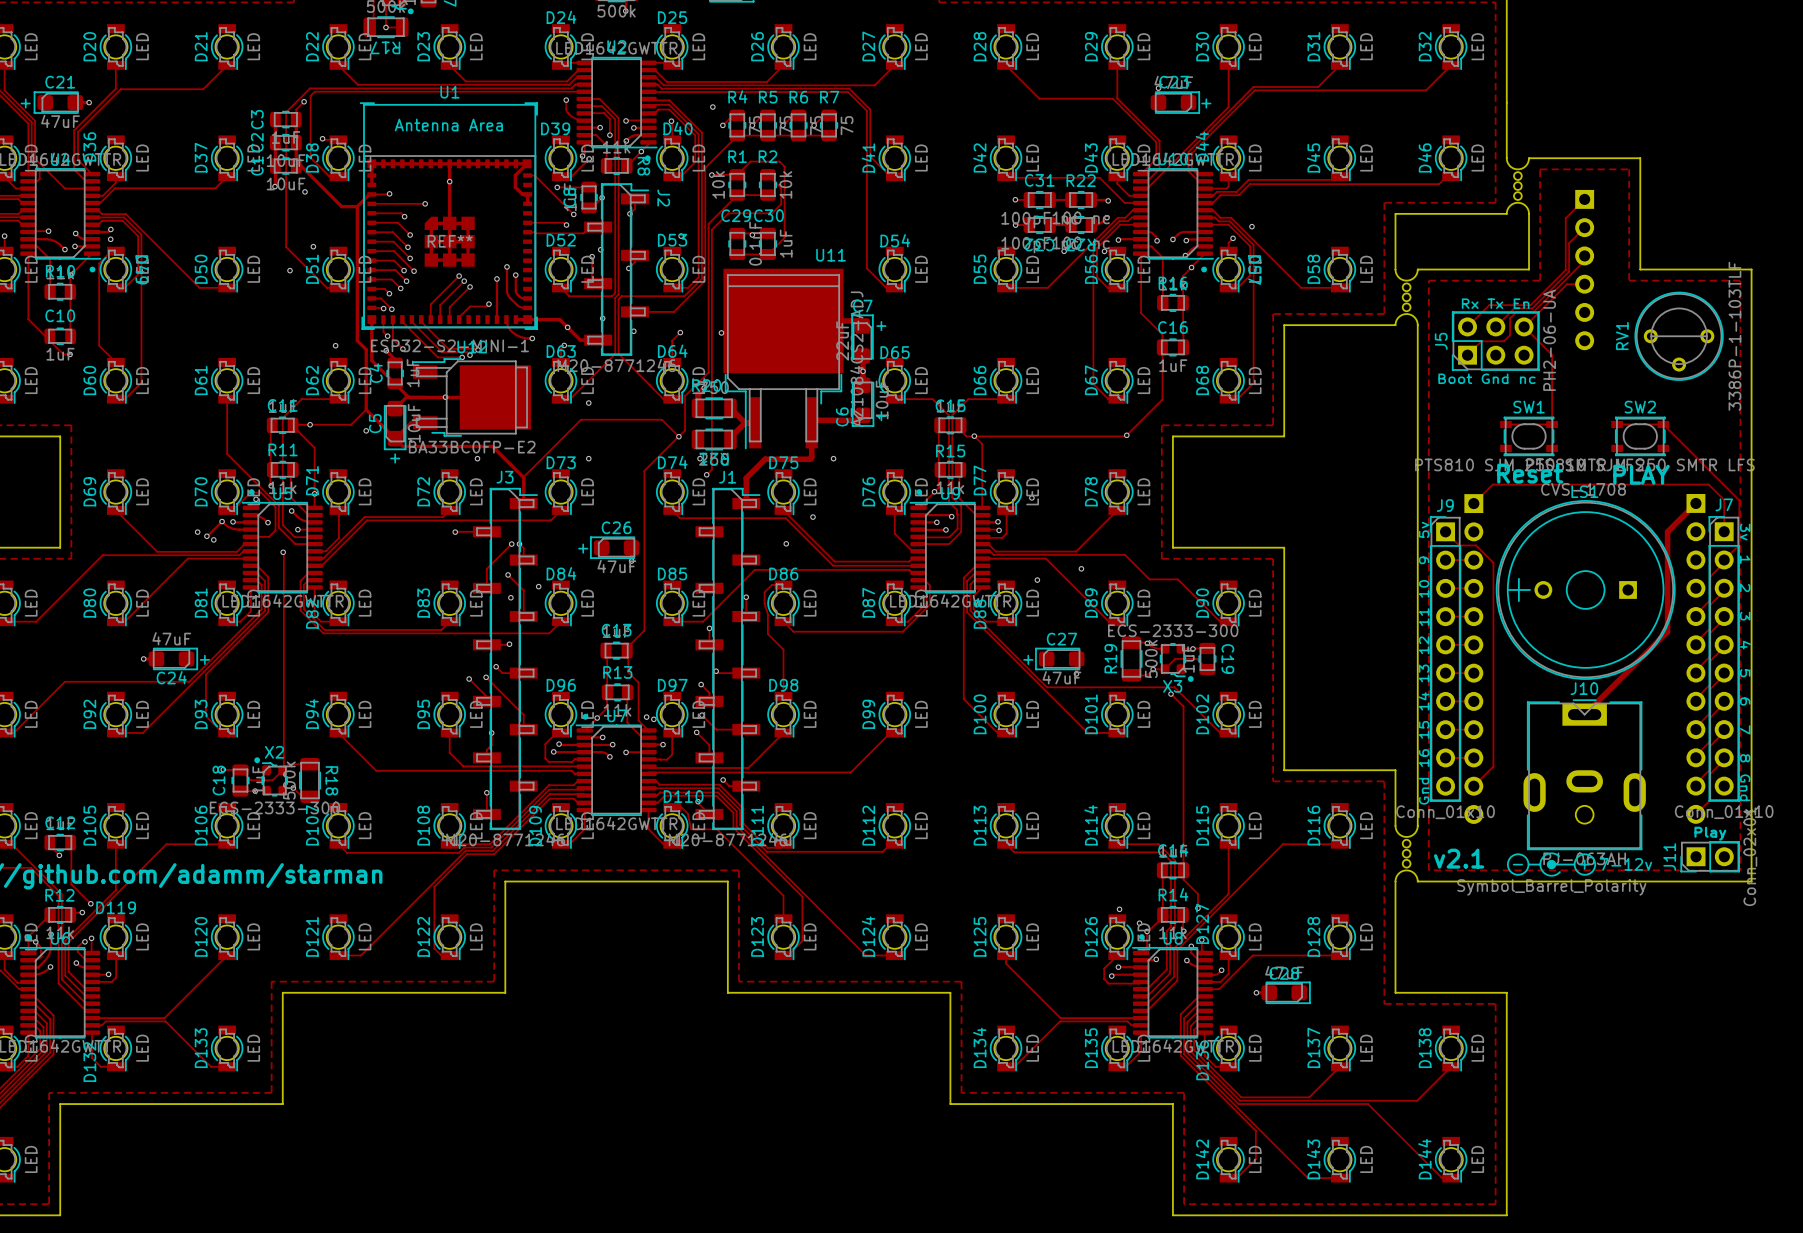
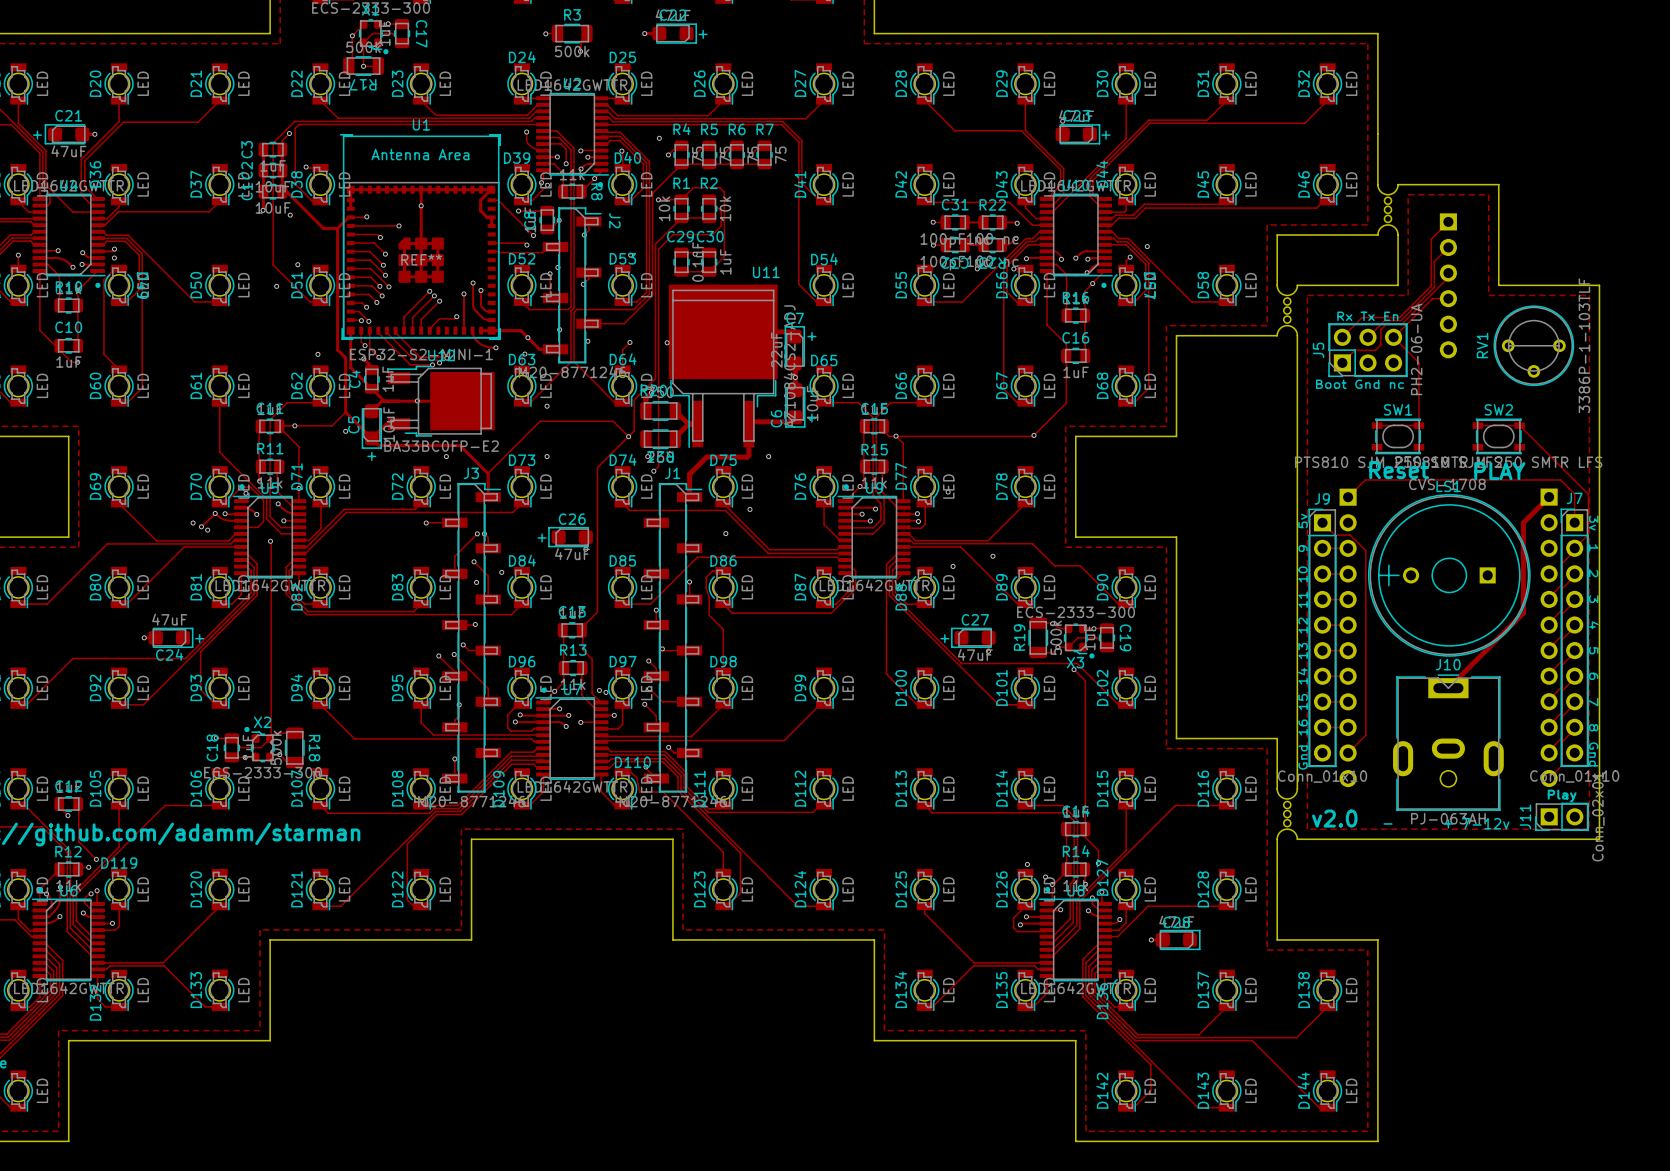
drawing: [1507, 852, 1597, 877] -> none
text: v2.1 (1459, 858) -> v2.0 (1334, 818)

